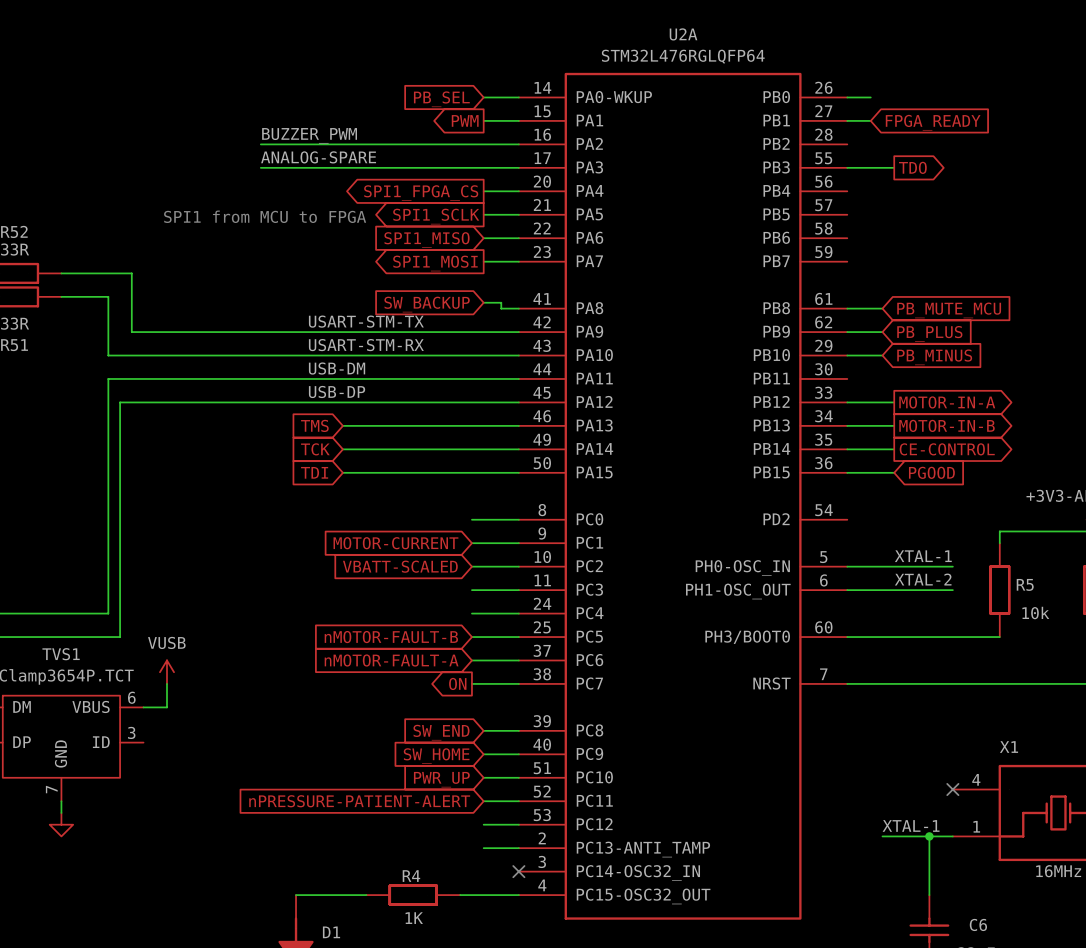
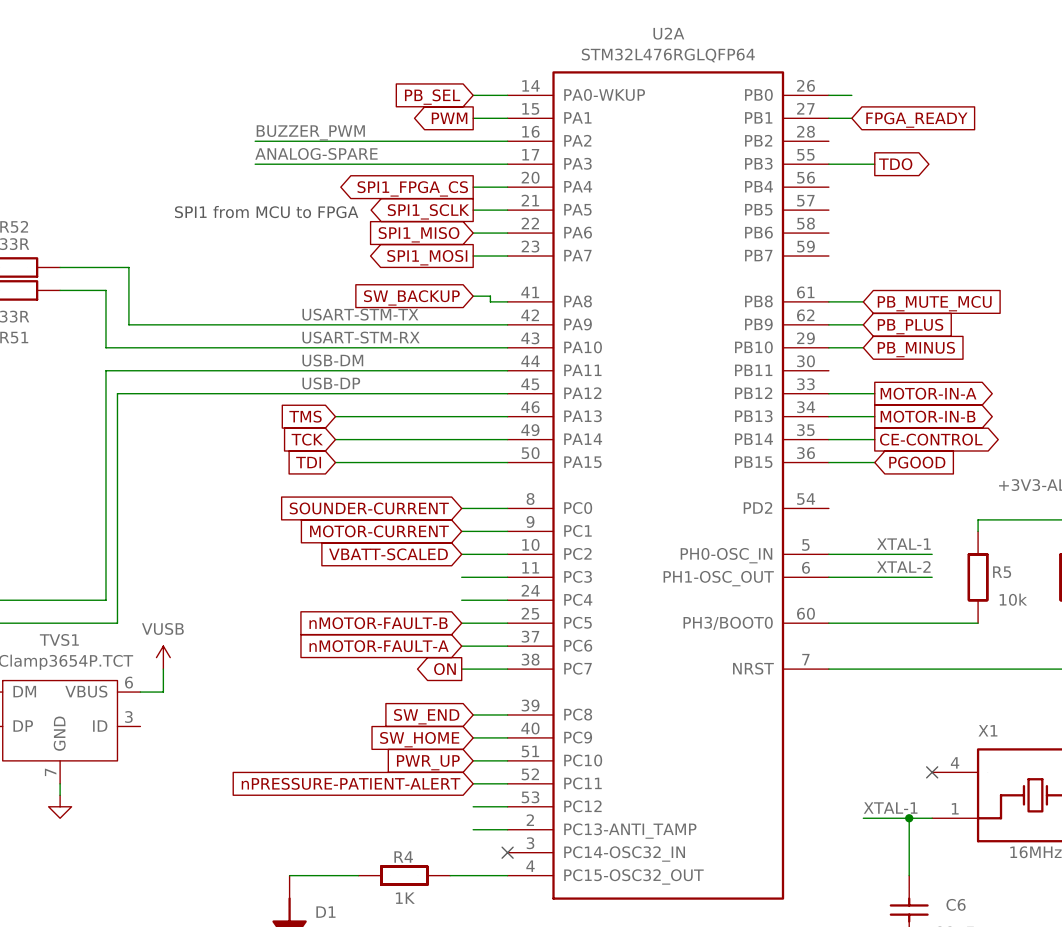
global label: none -> SOUNDER-CURRENT (369, 508)

